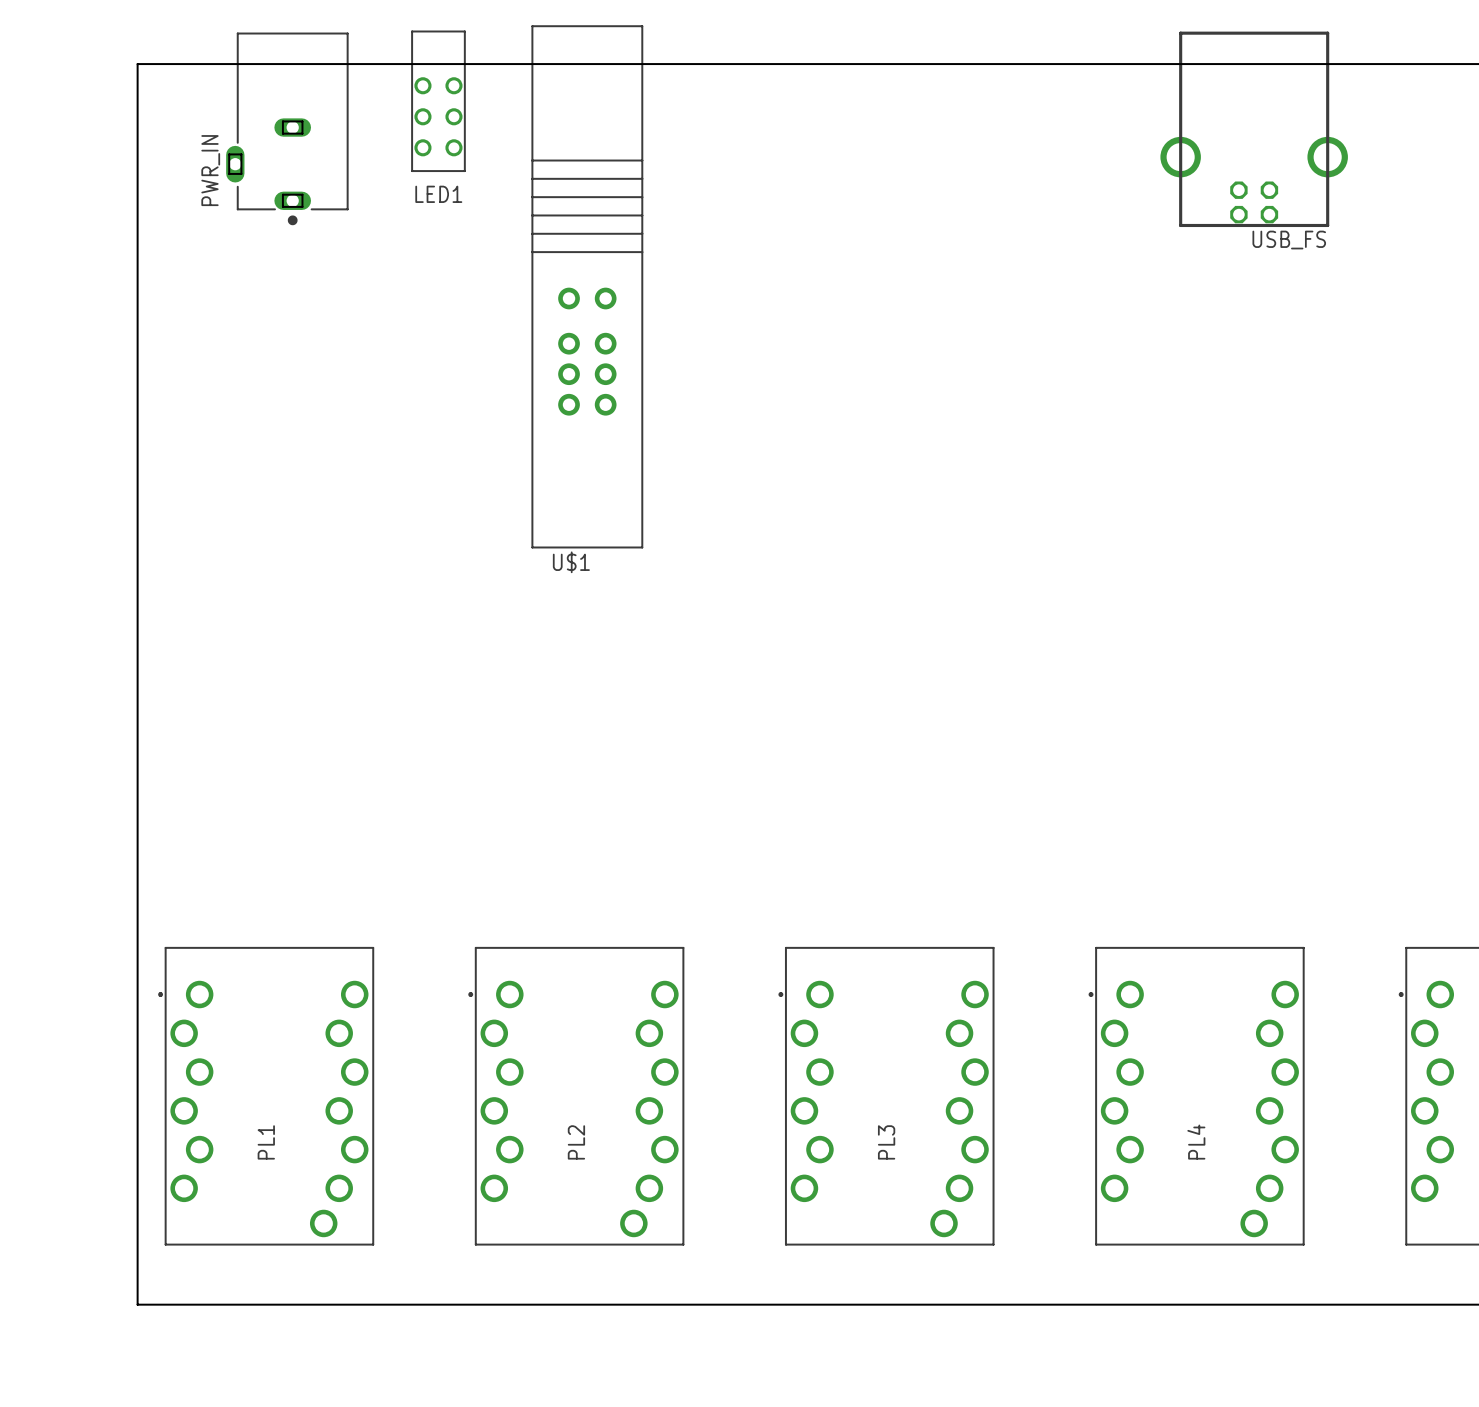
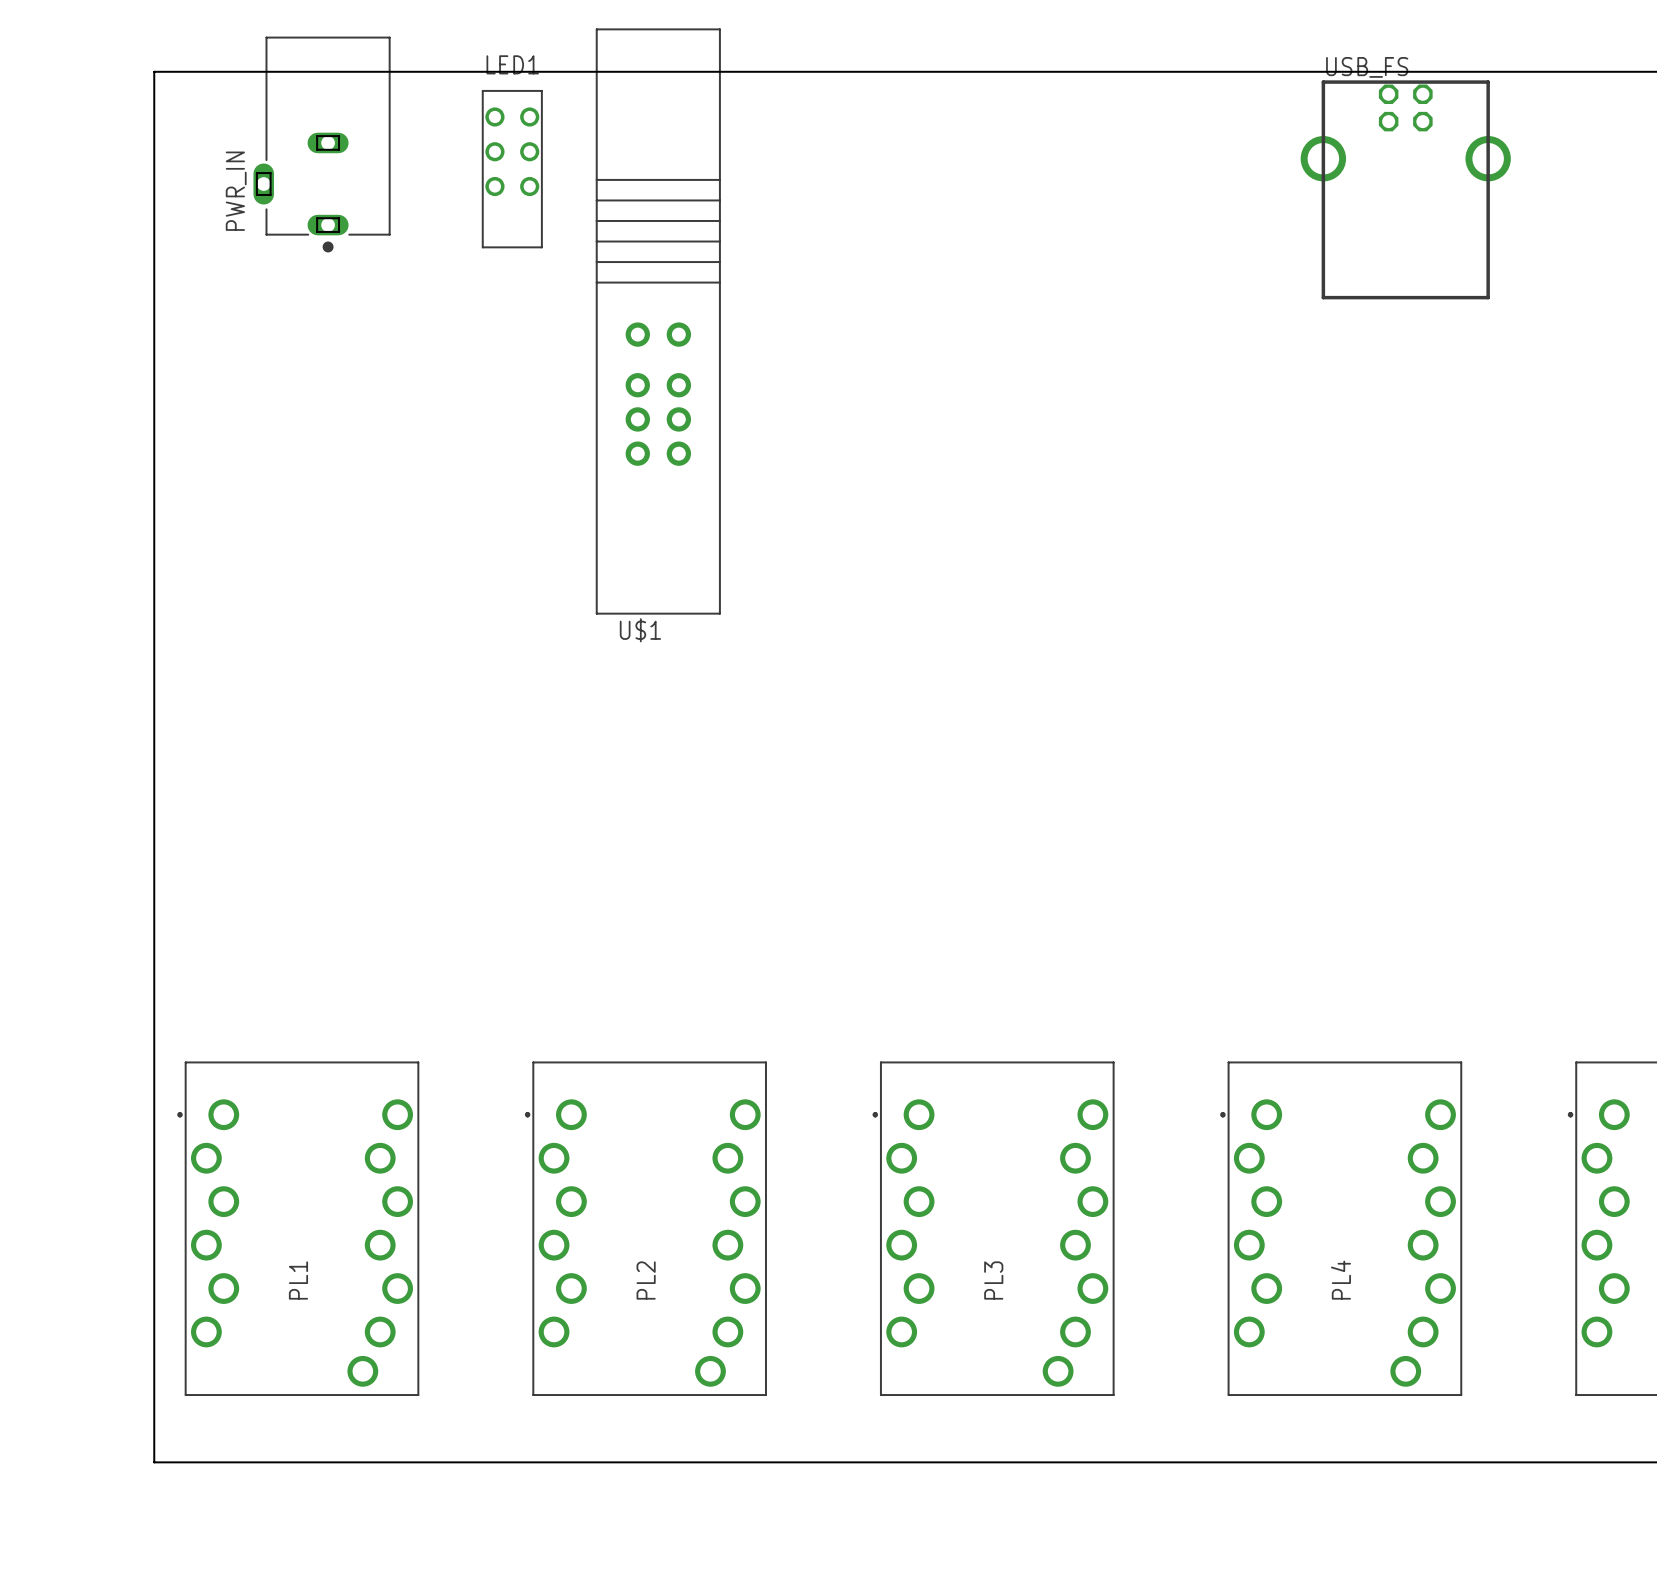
LED1 rotation: 0° (438, 101) -> 180° (512, 169)
USB_FS rotation: 0° (1254, 129) -> 180° (1405, 189)

